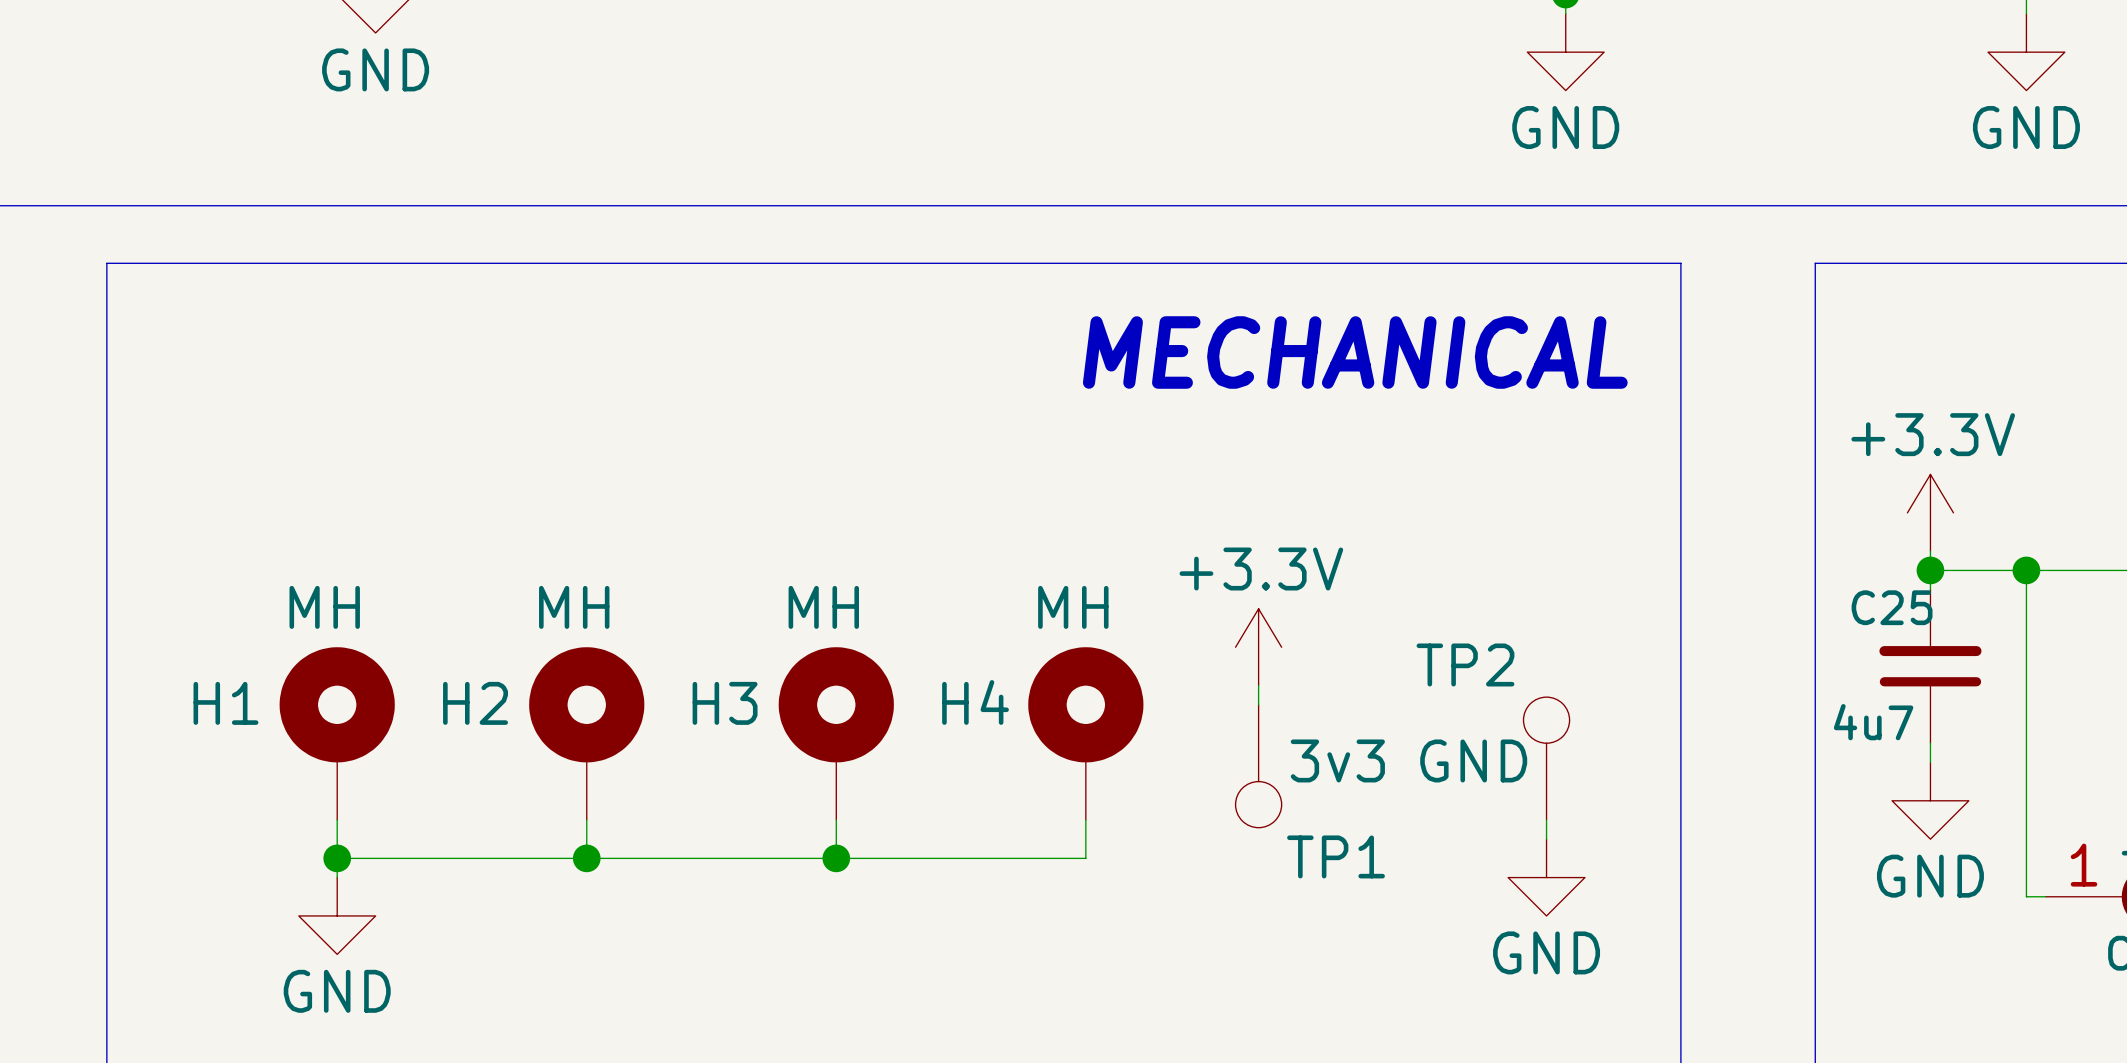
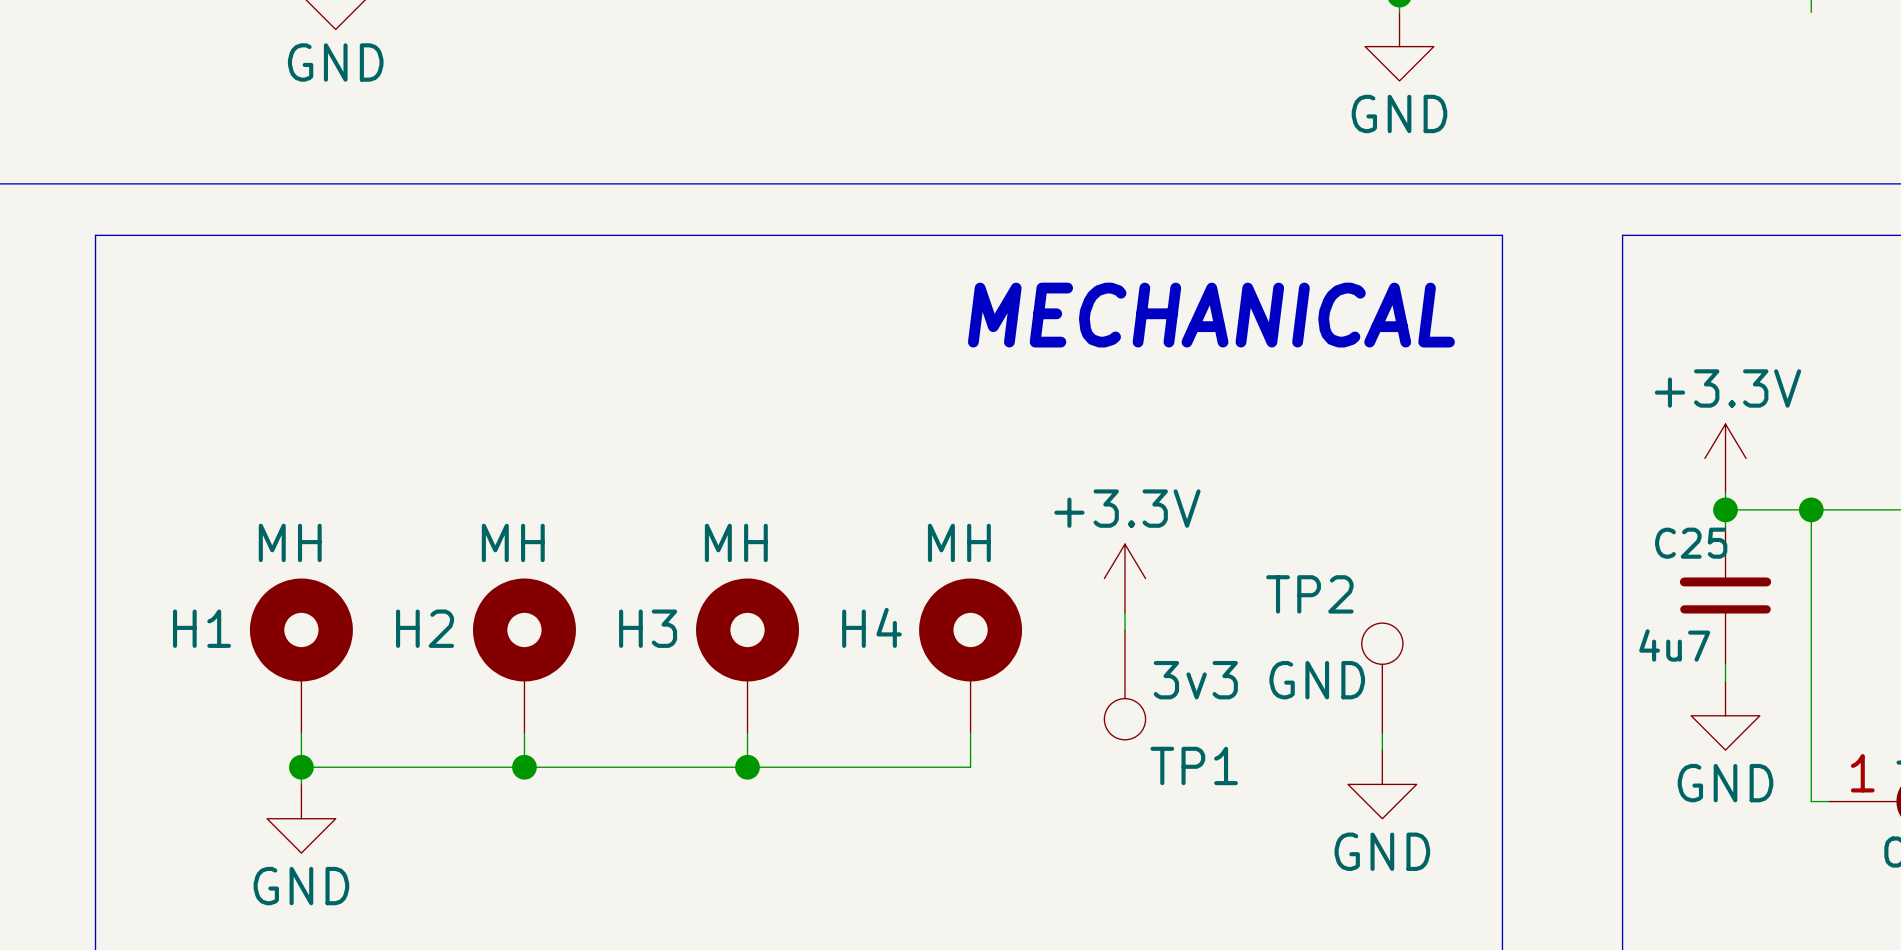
power symbol: GND (2026, 52) -> none

